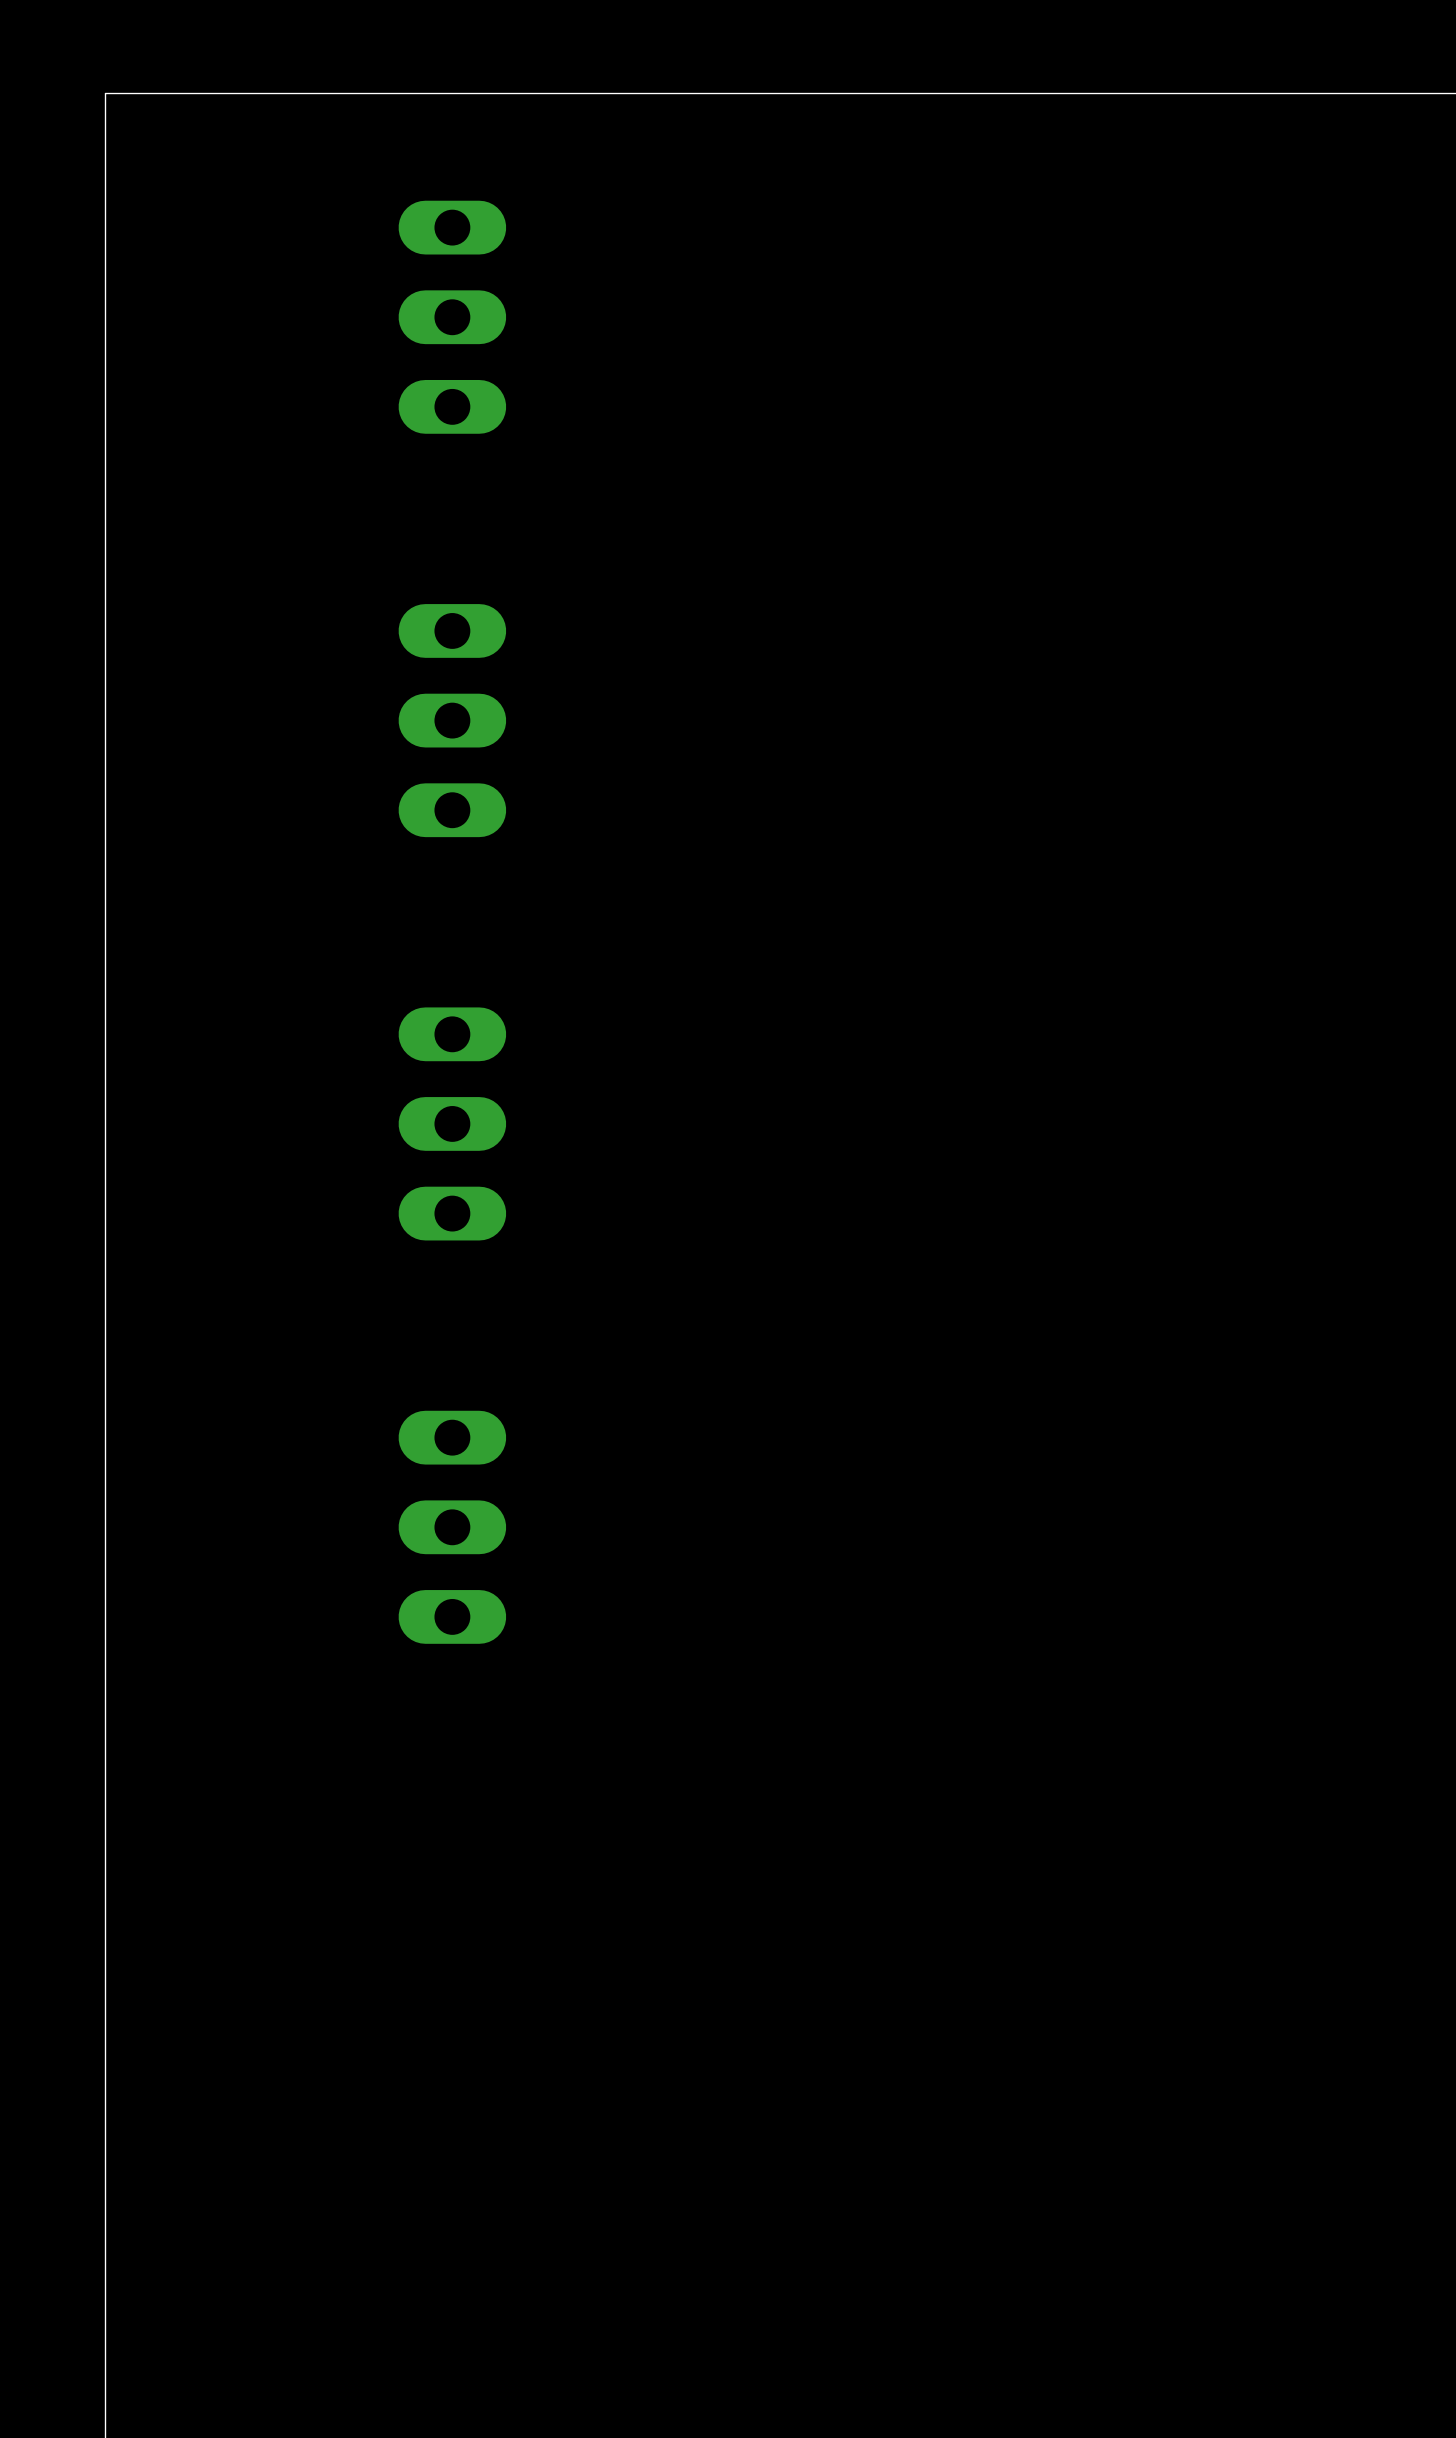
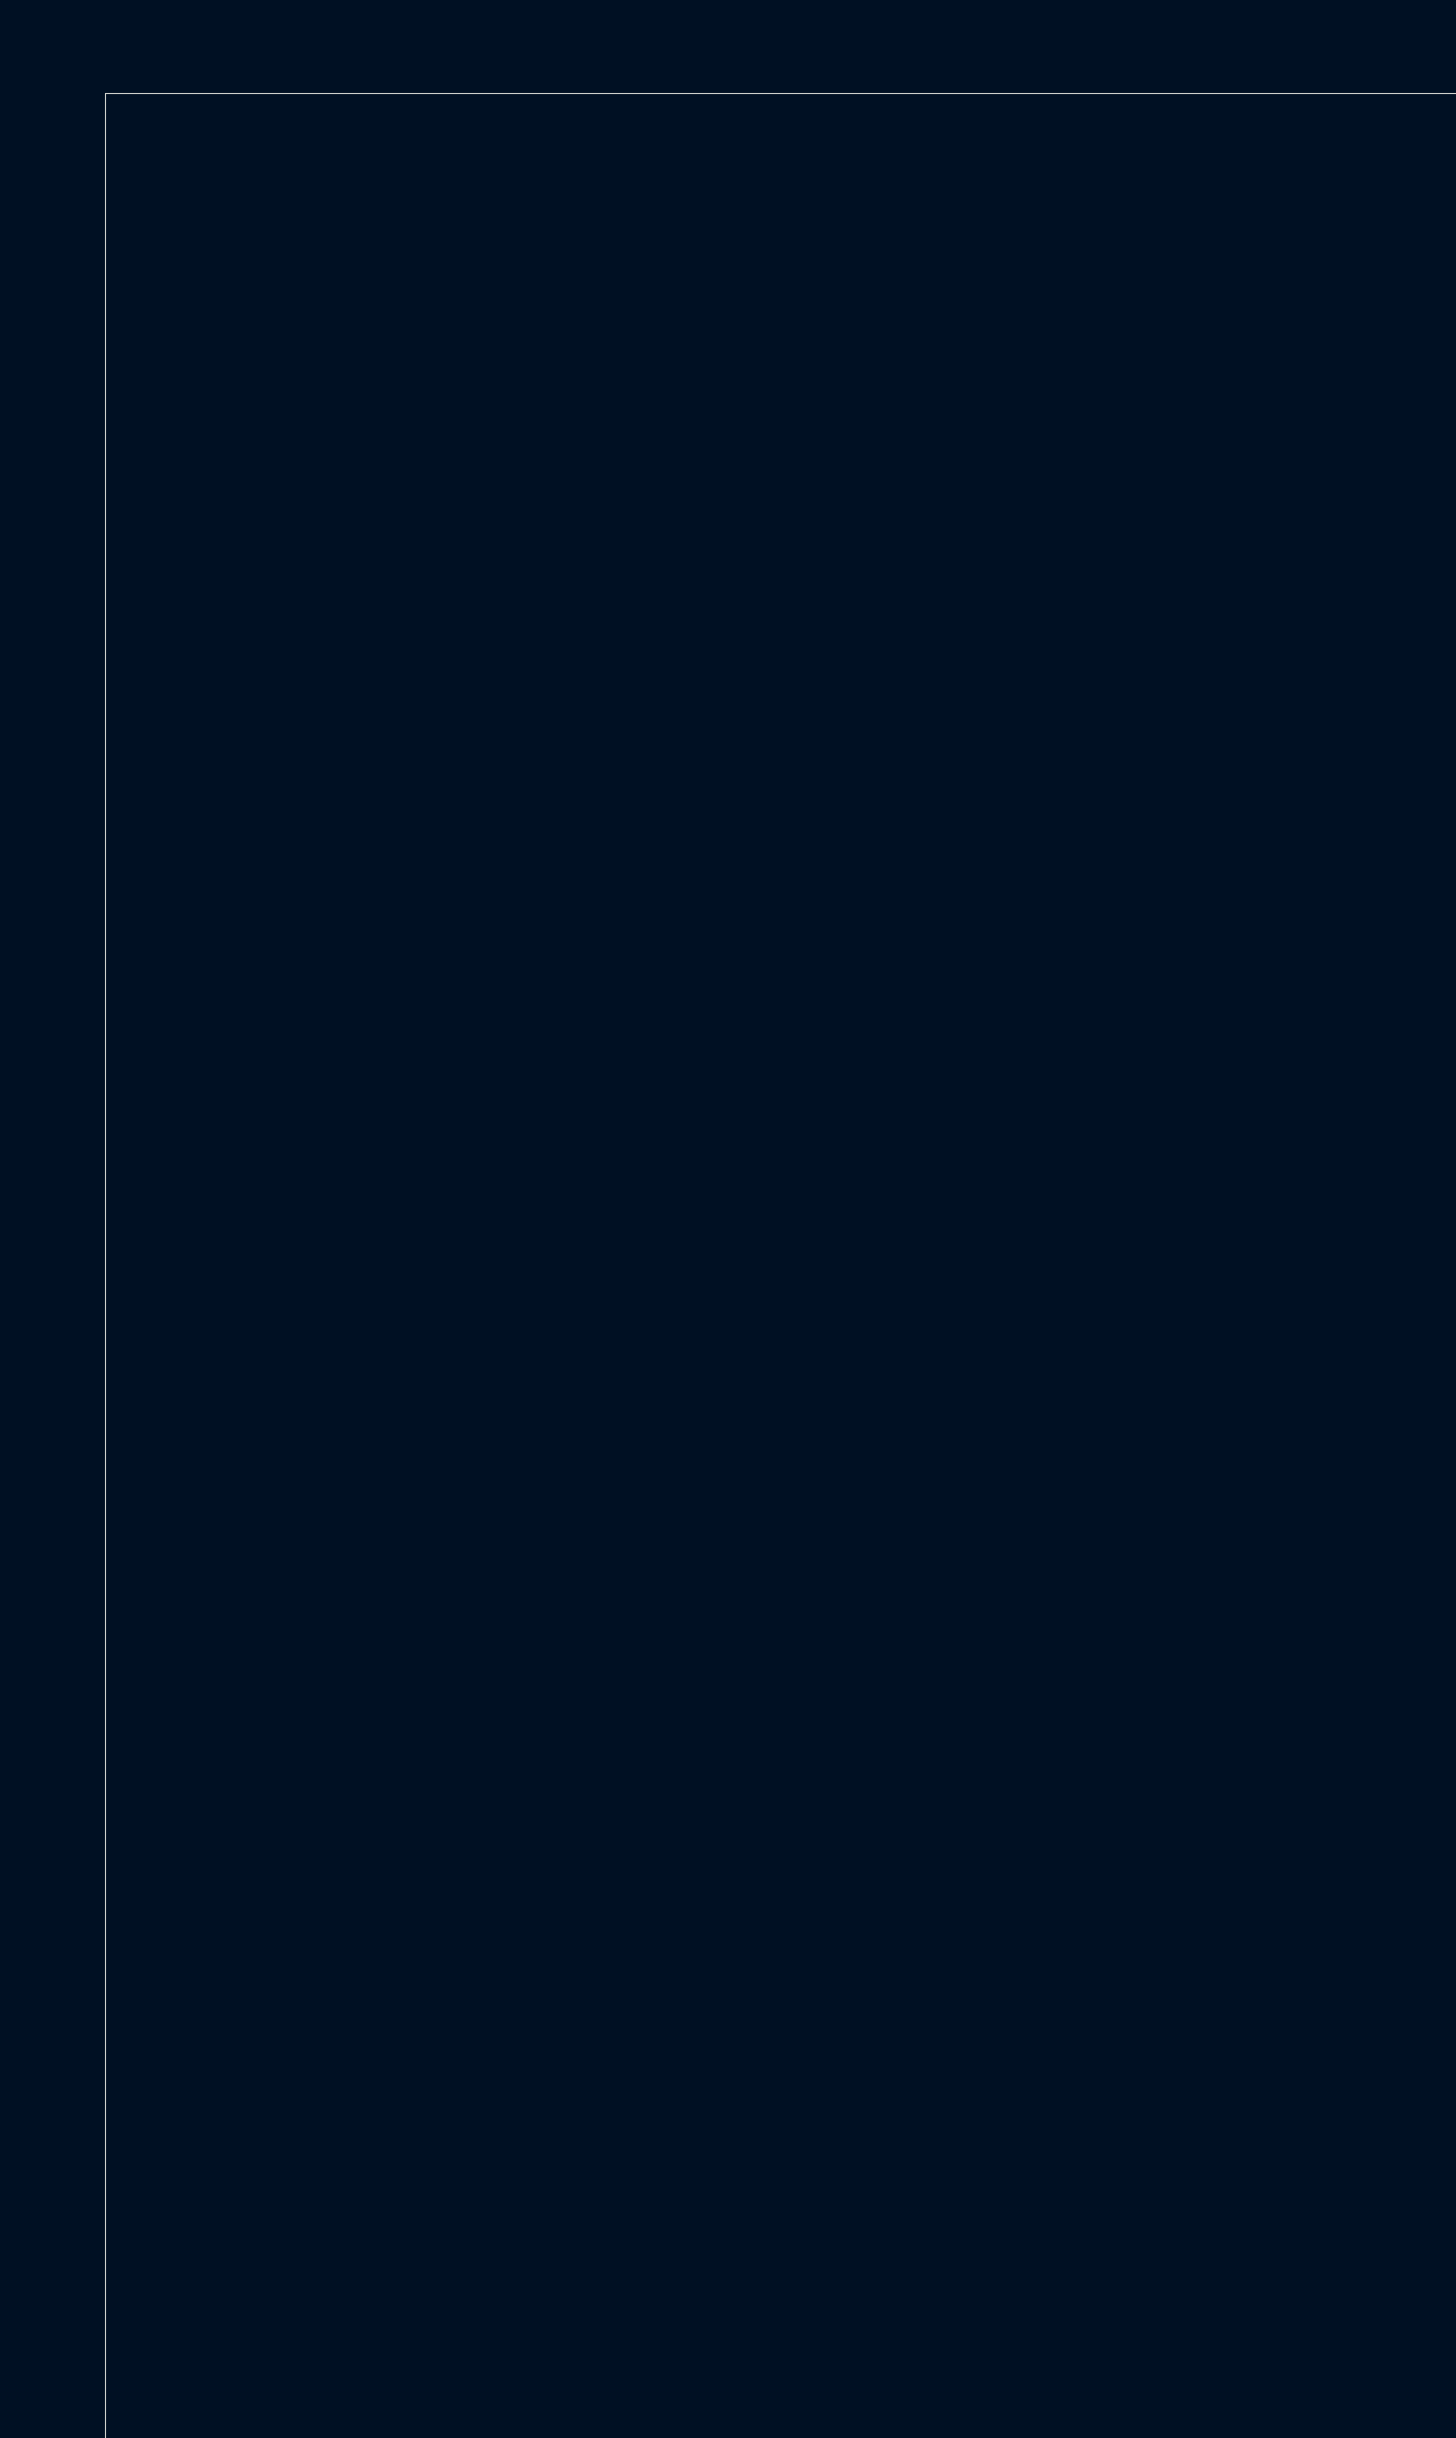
part: (452, 317) -> none
part: (452, 720) -> none
part: (452, 1123) -> none
part: (452, 1527) -> none

